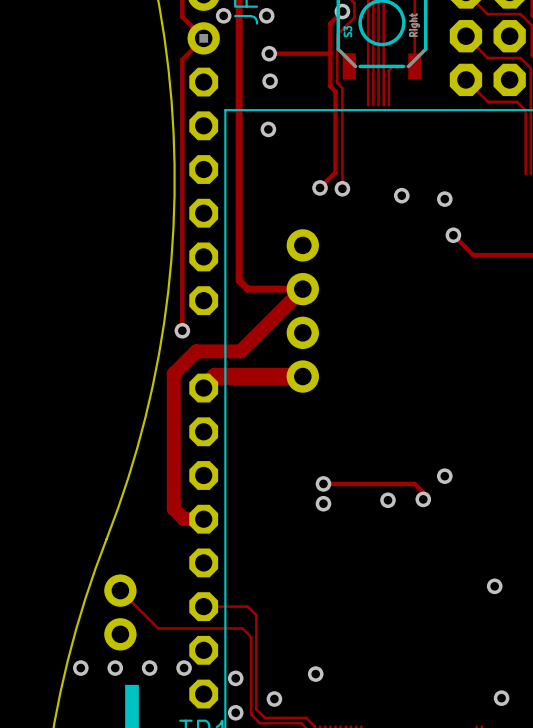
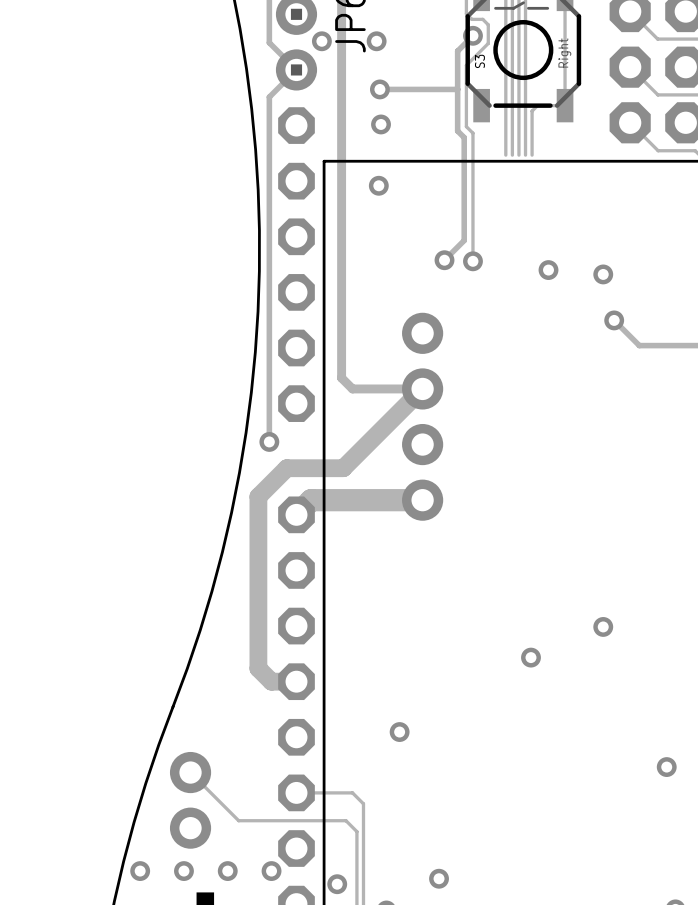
track: (323, 483) (414, 483) (423, 492) (423, 499) -> none
via: (323, 483) -> none
via: (423, 499) -> none
via: (323, 503) -> none
via: none -> (399, 732)

